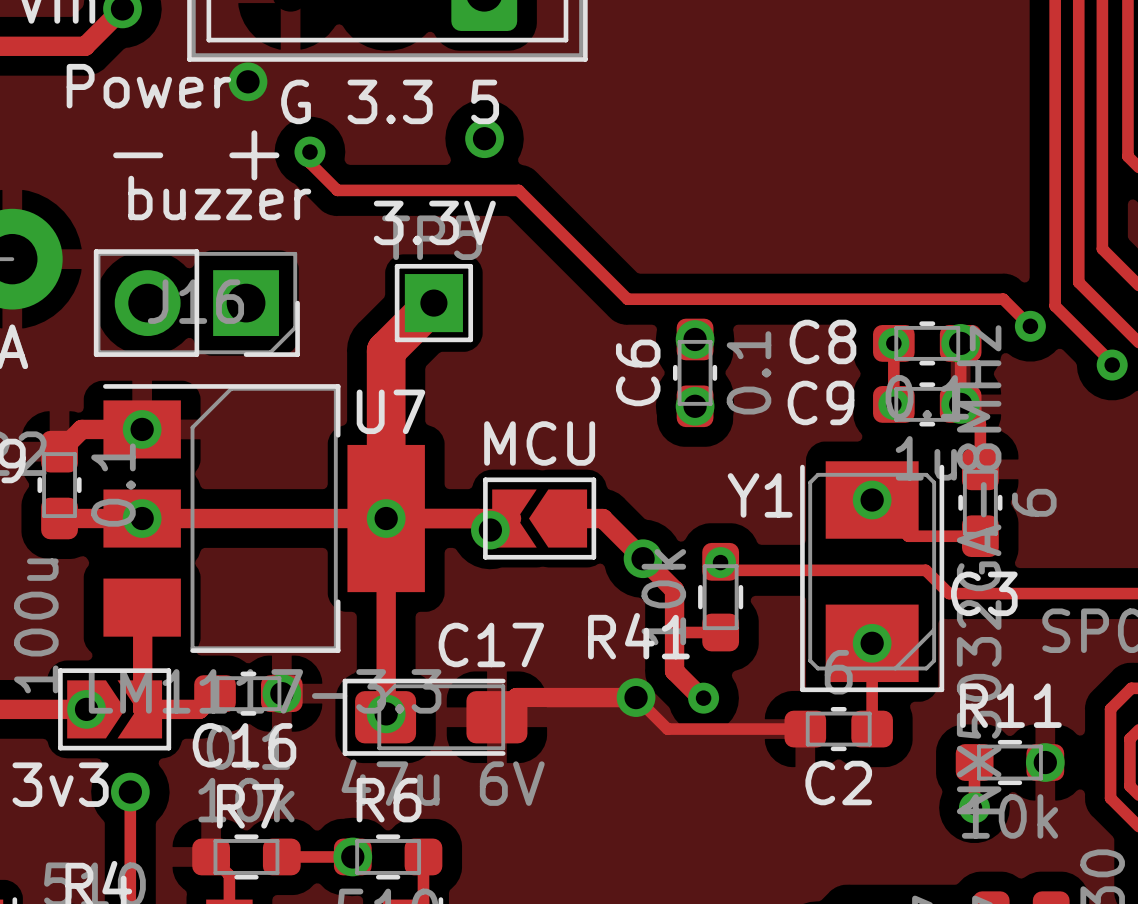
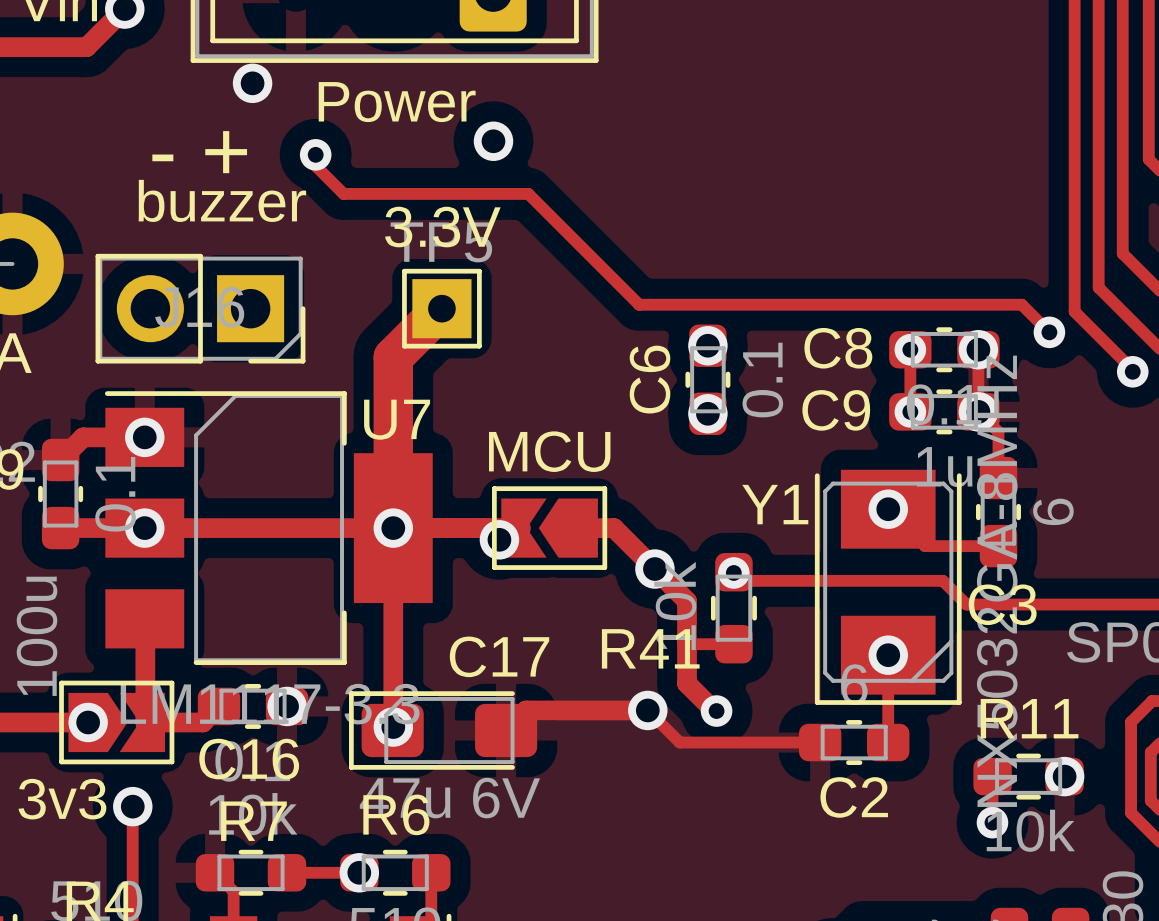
part value position: Power (148, 86) -> Power (397, 102)
text: G 3.3 5 (390, 101) -> none

